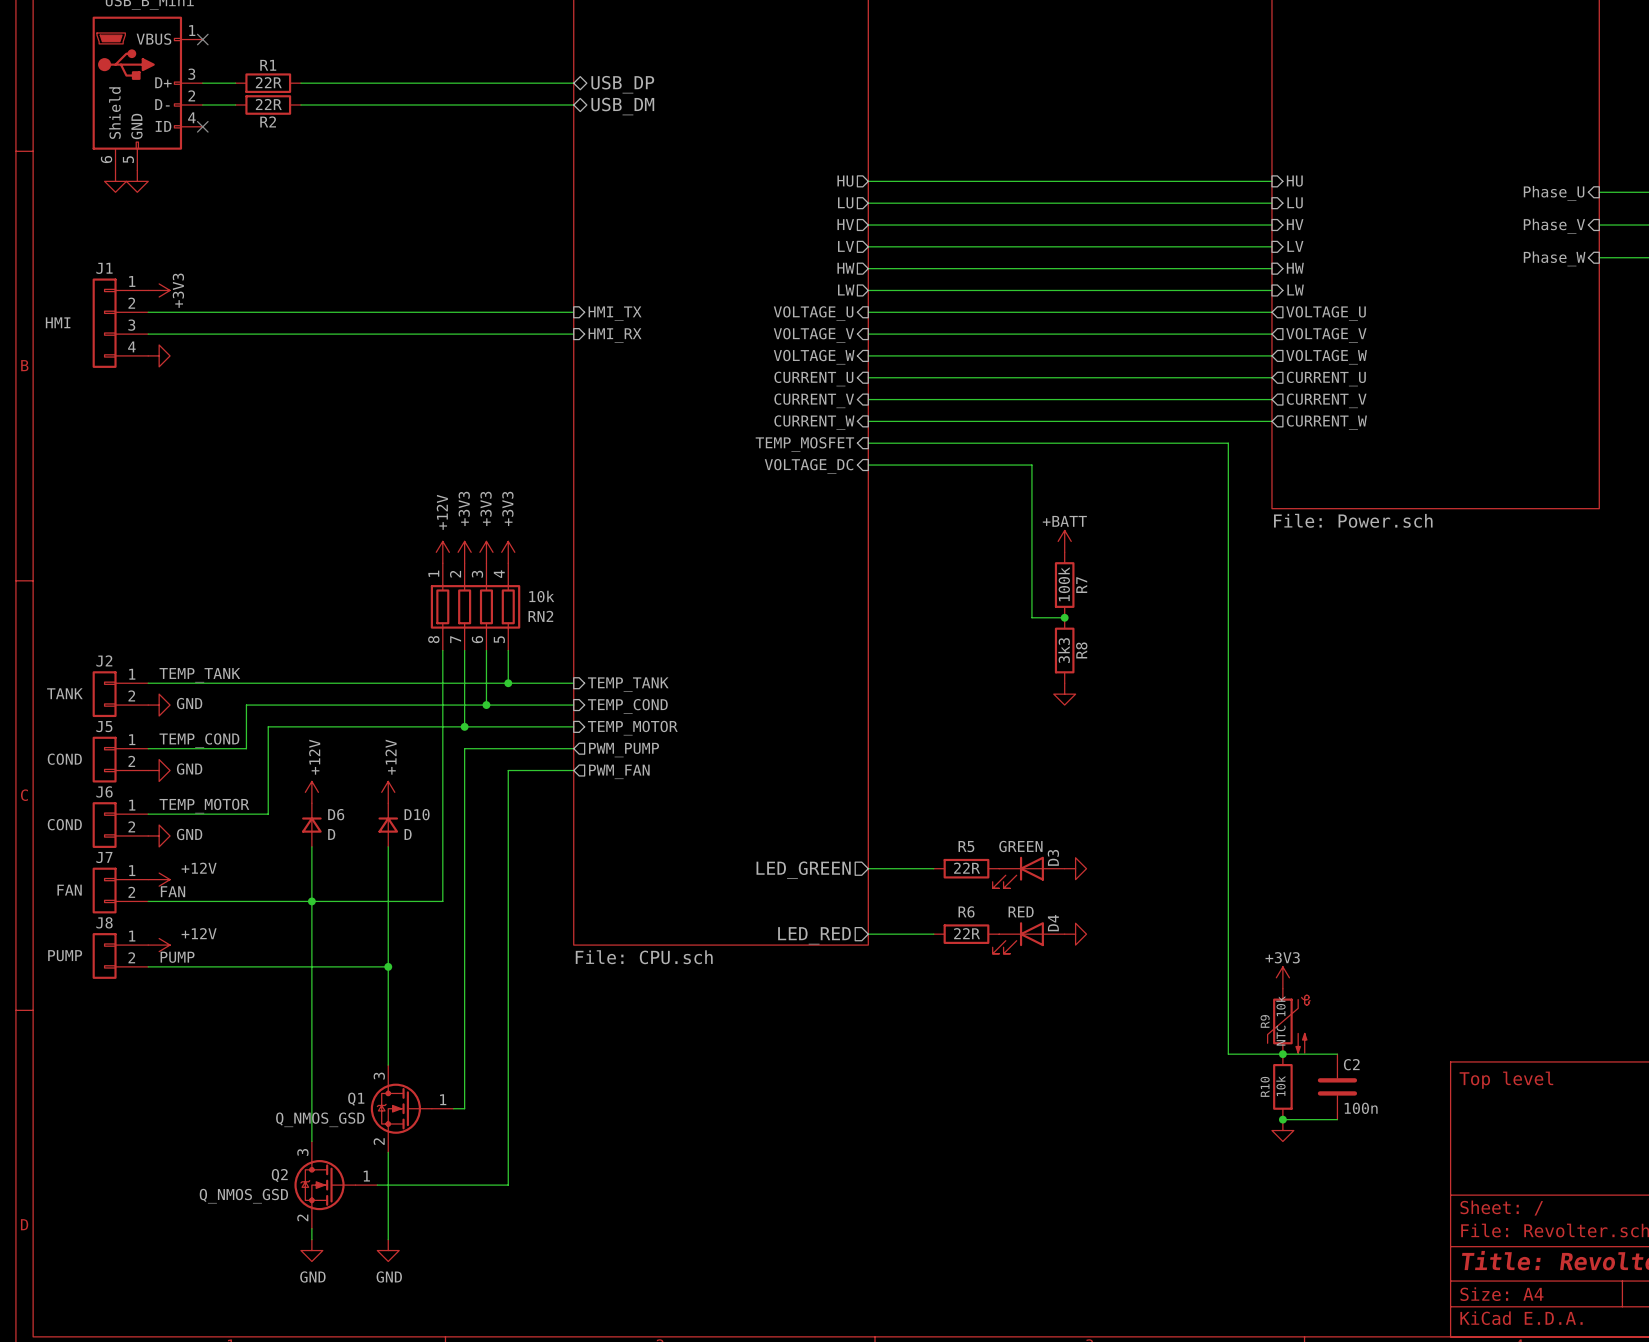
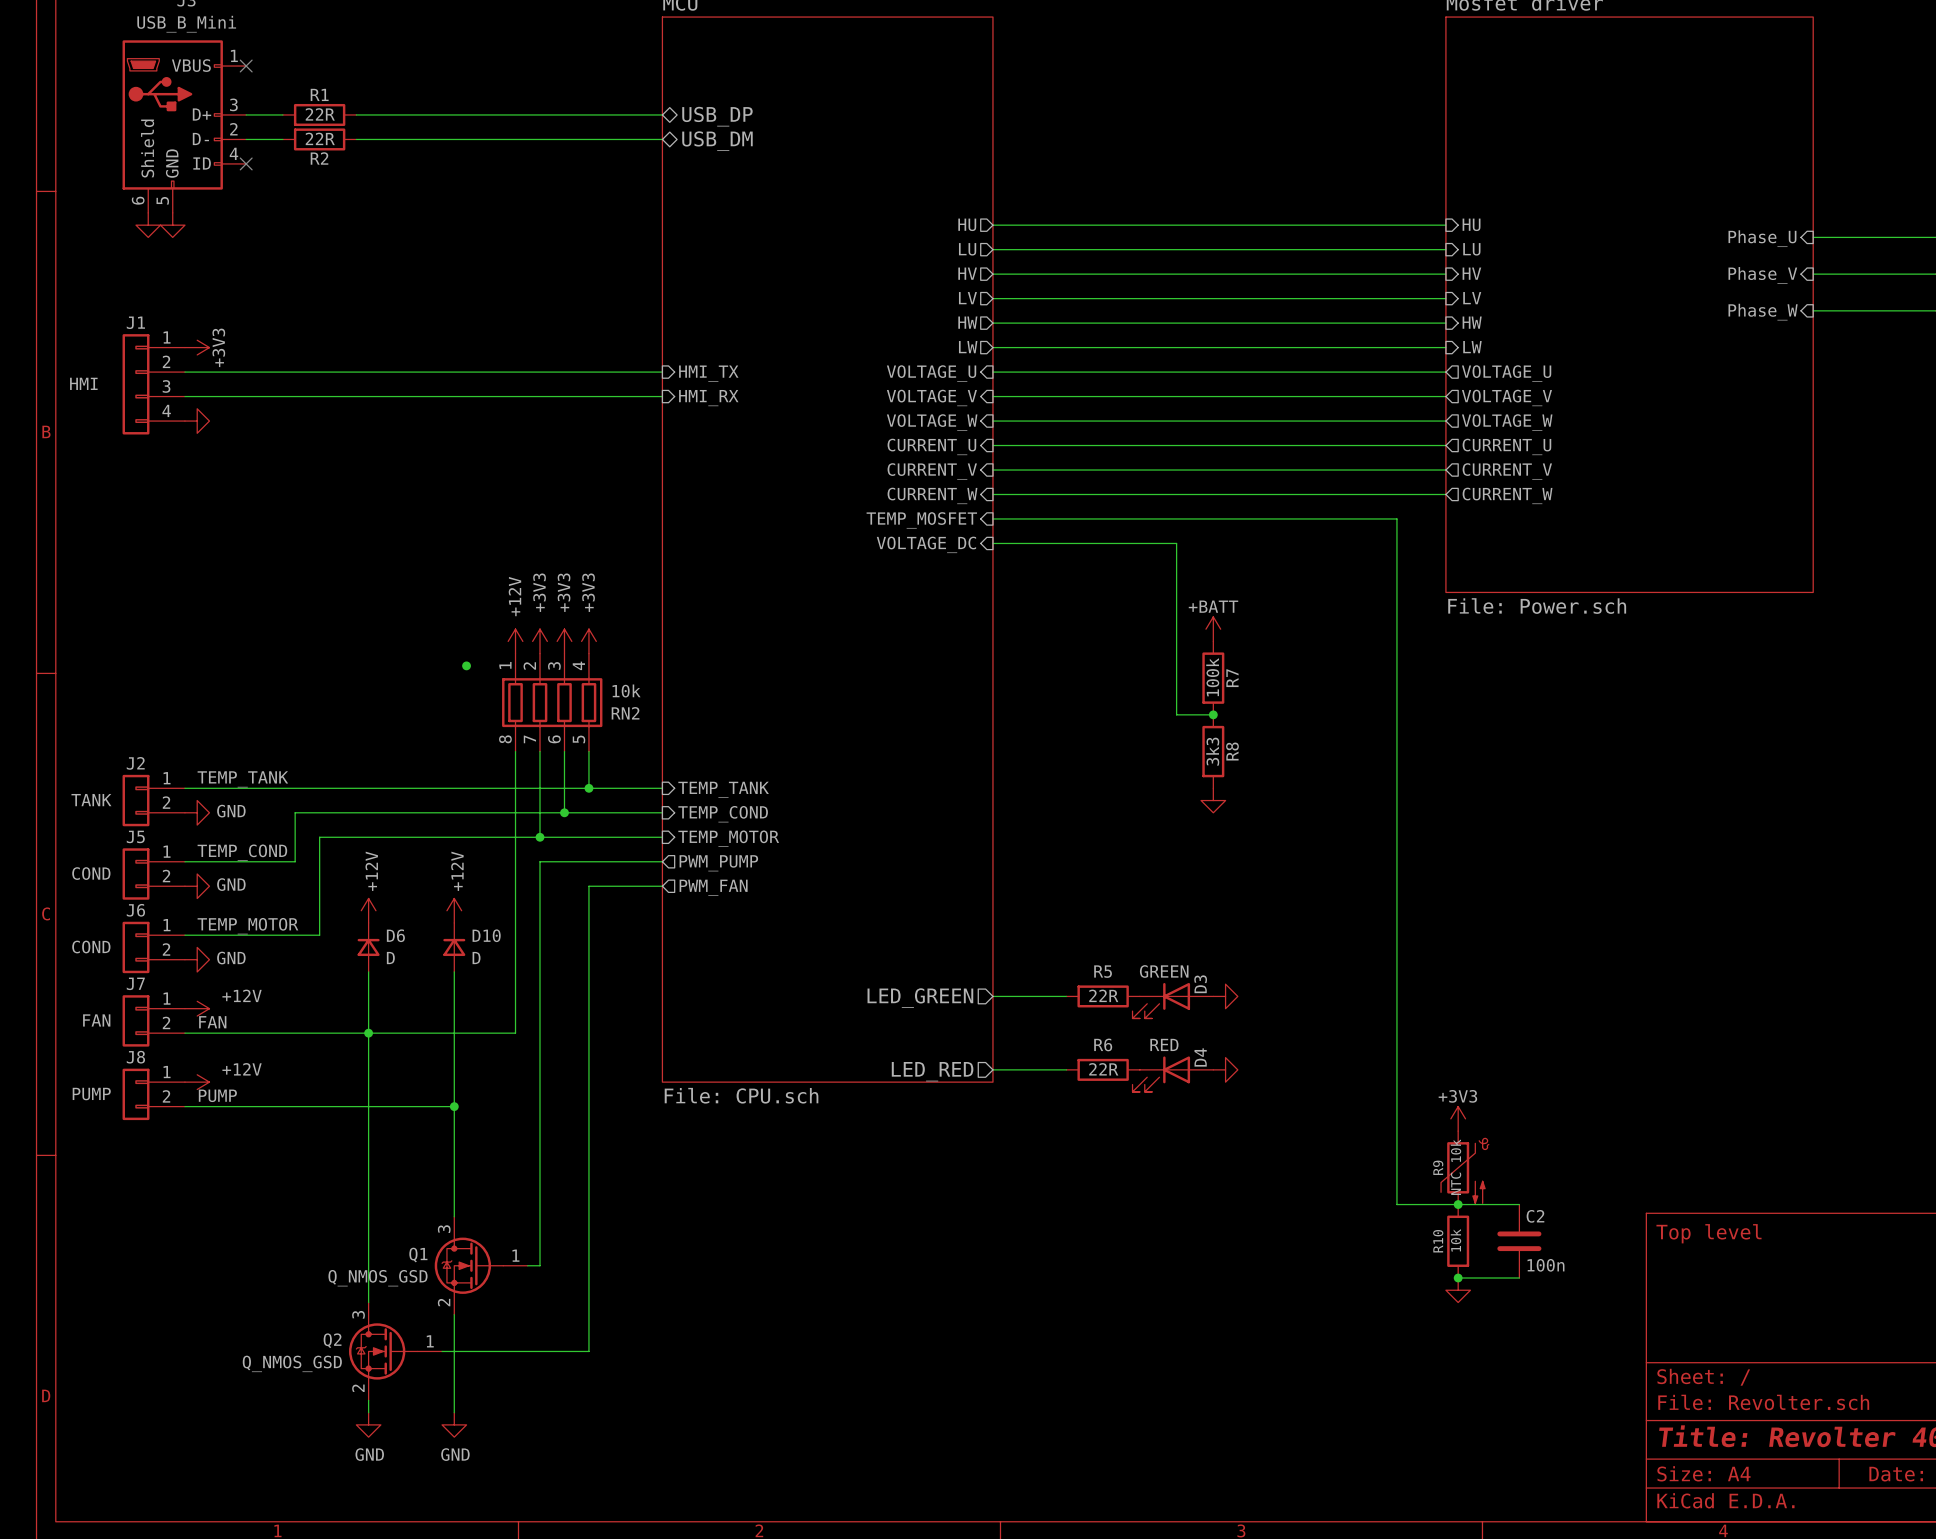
junction: none -> (466, 665)

